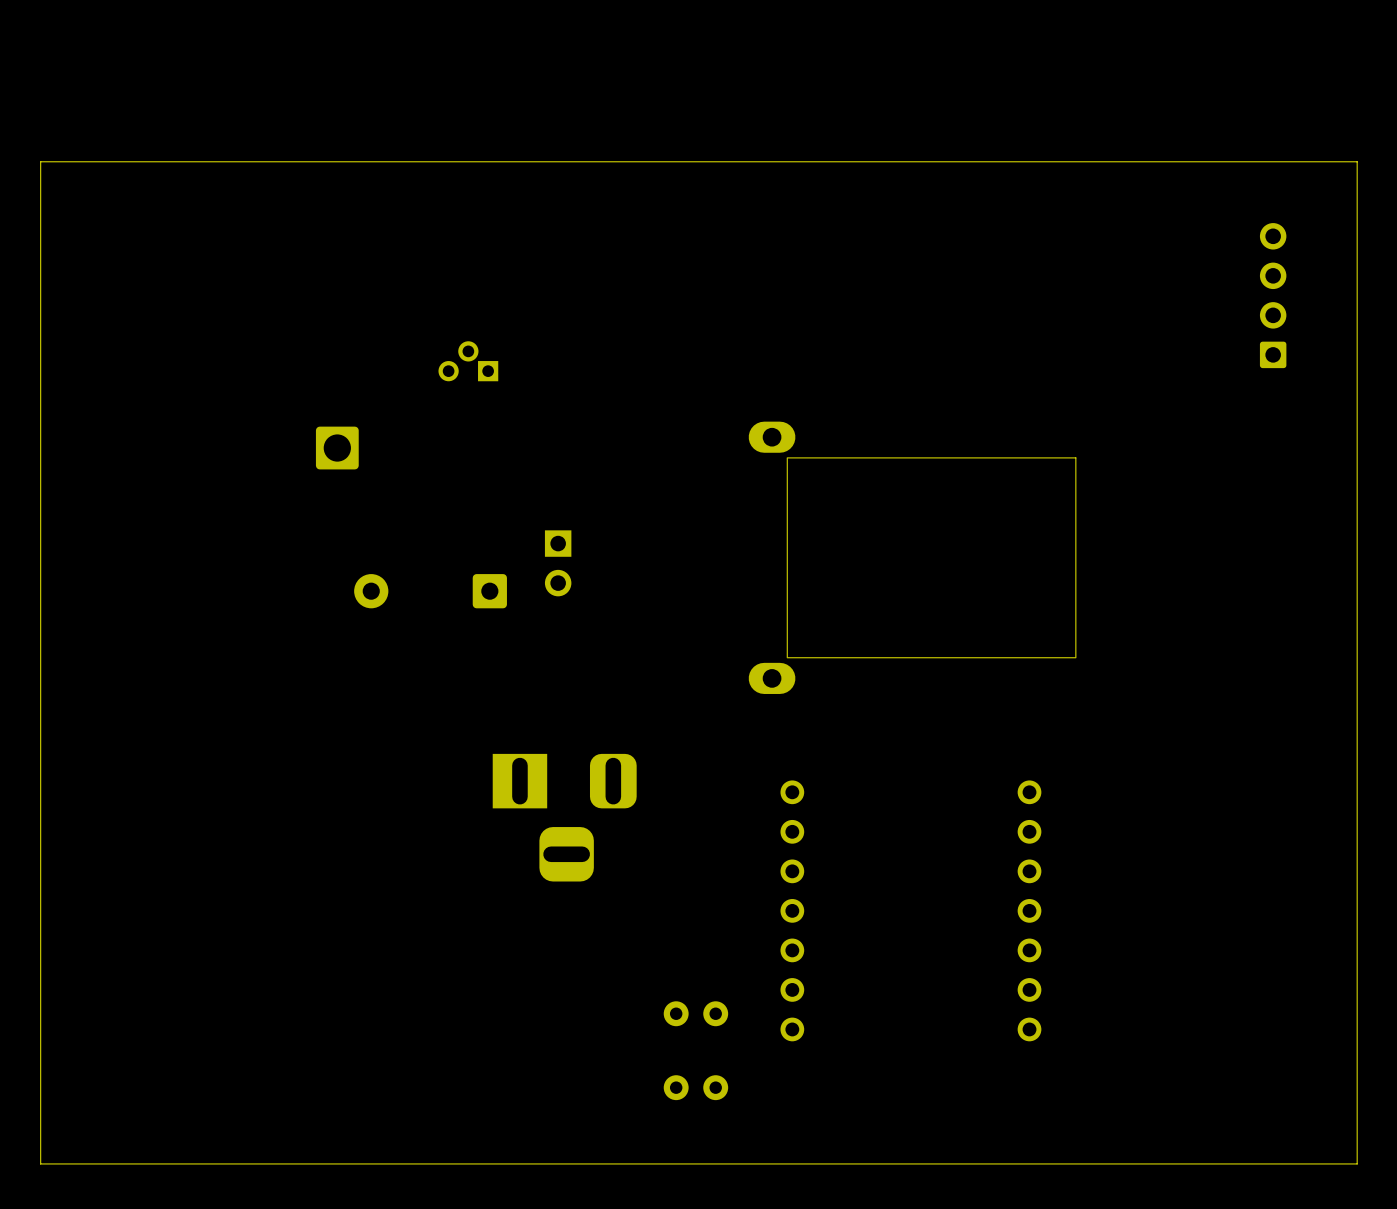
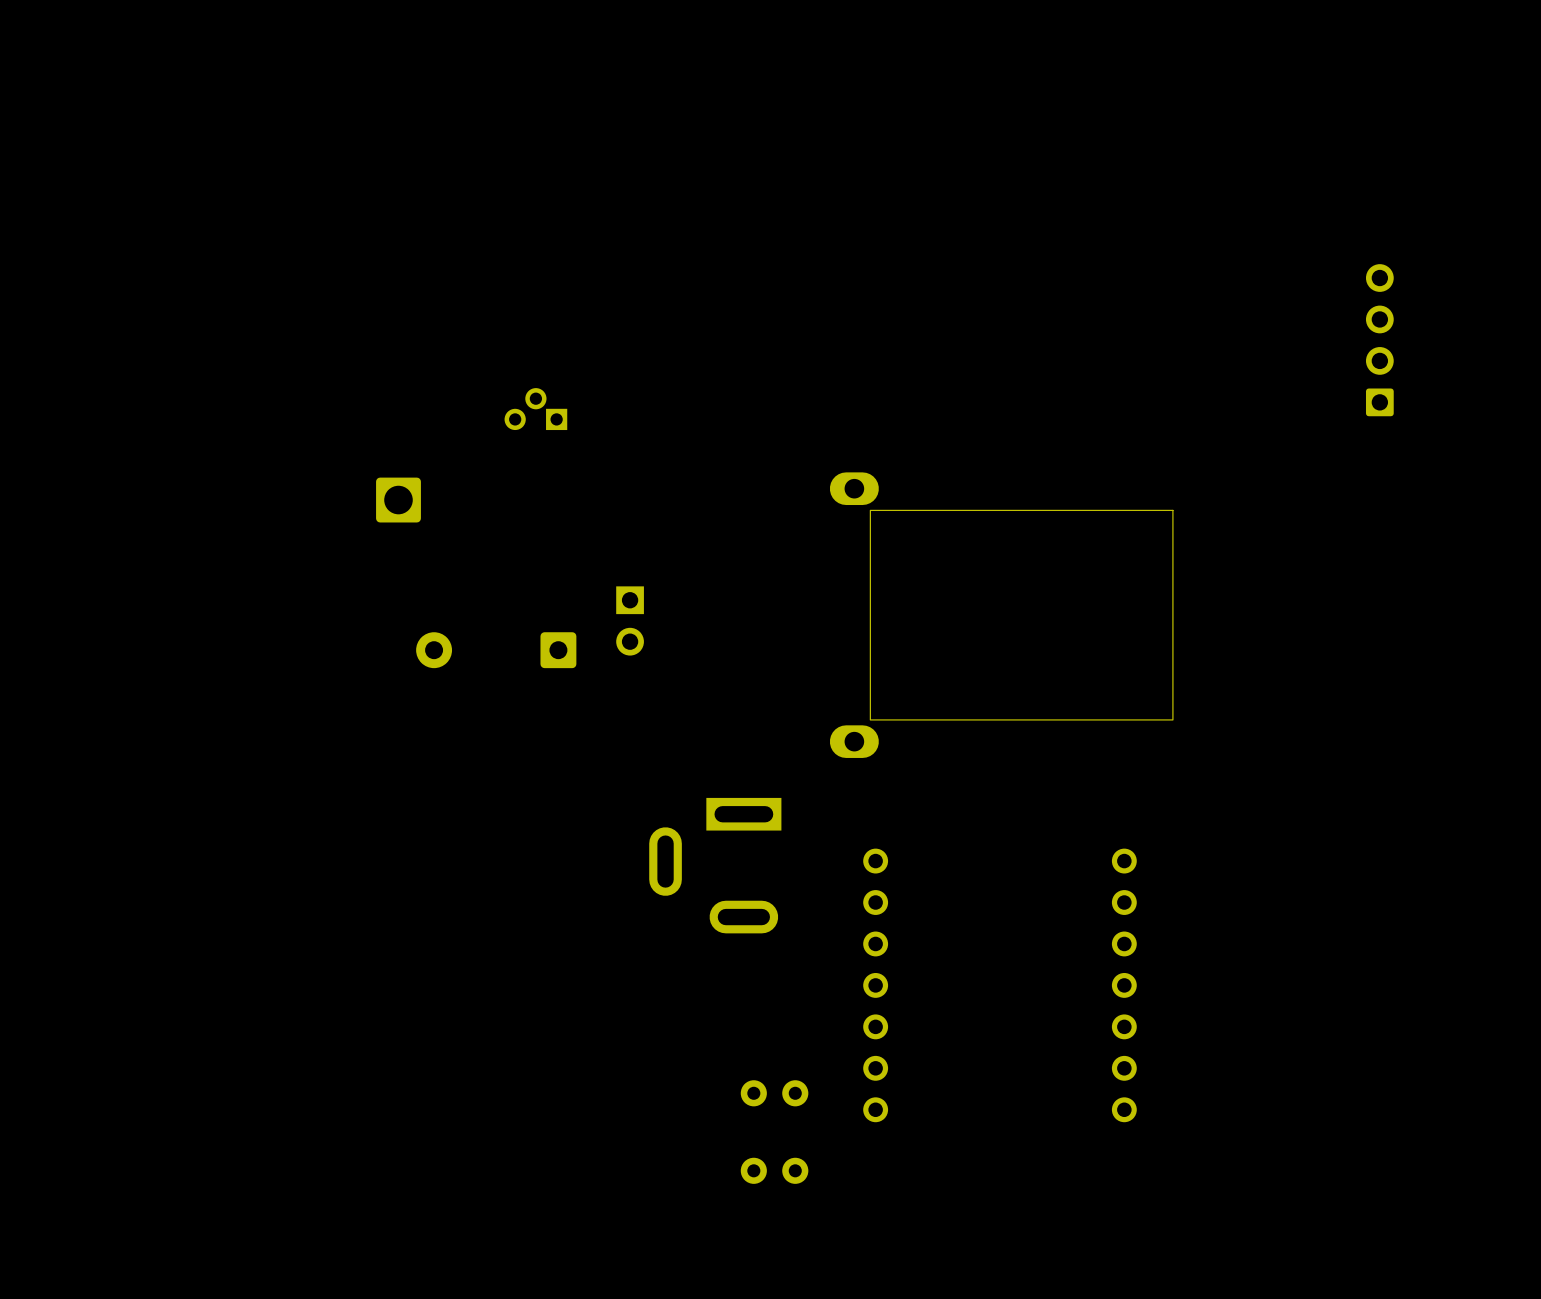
board edge: (1357, 161) (40, 161) (40, 1163) (1357, 1163) (1357, 161) -> none
part: none -> (715, 865)
part: (564, 817) -> none

